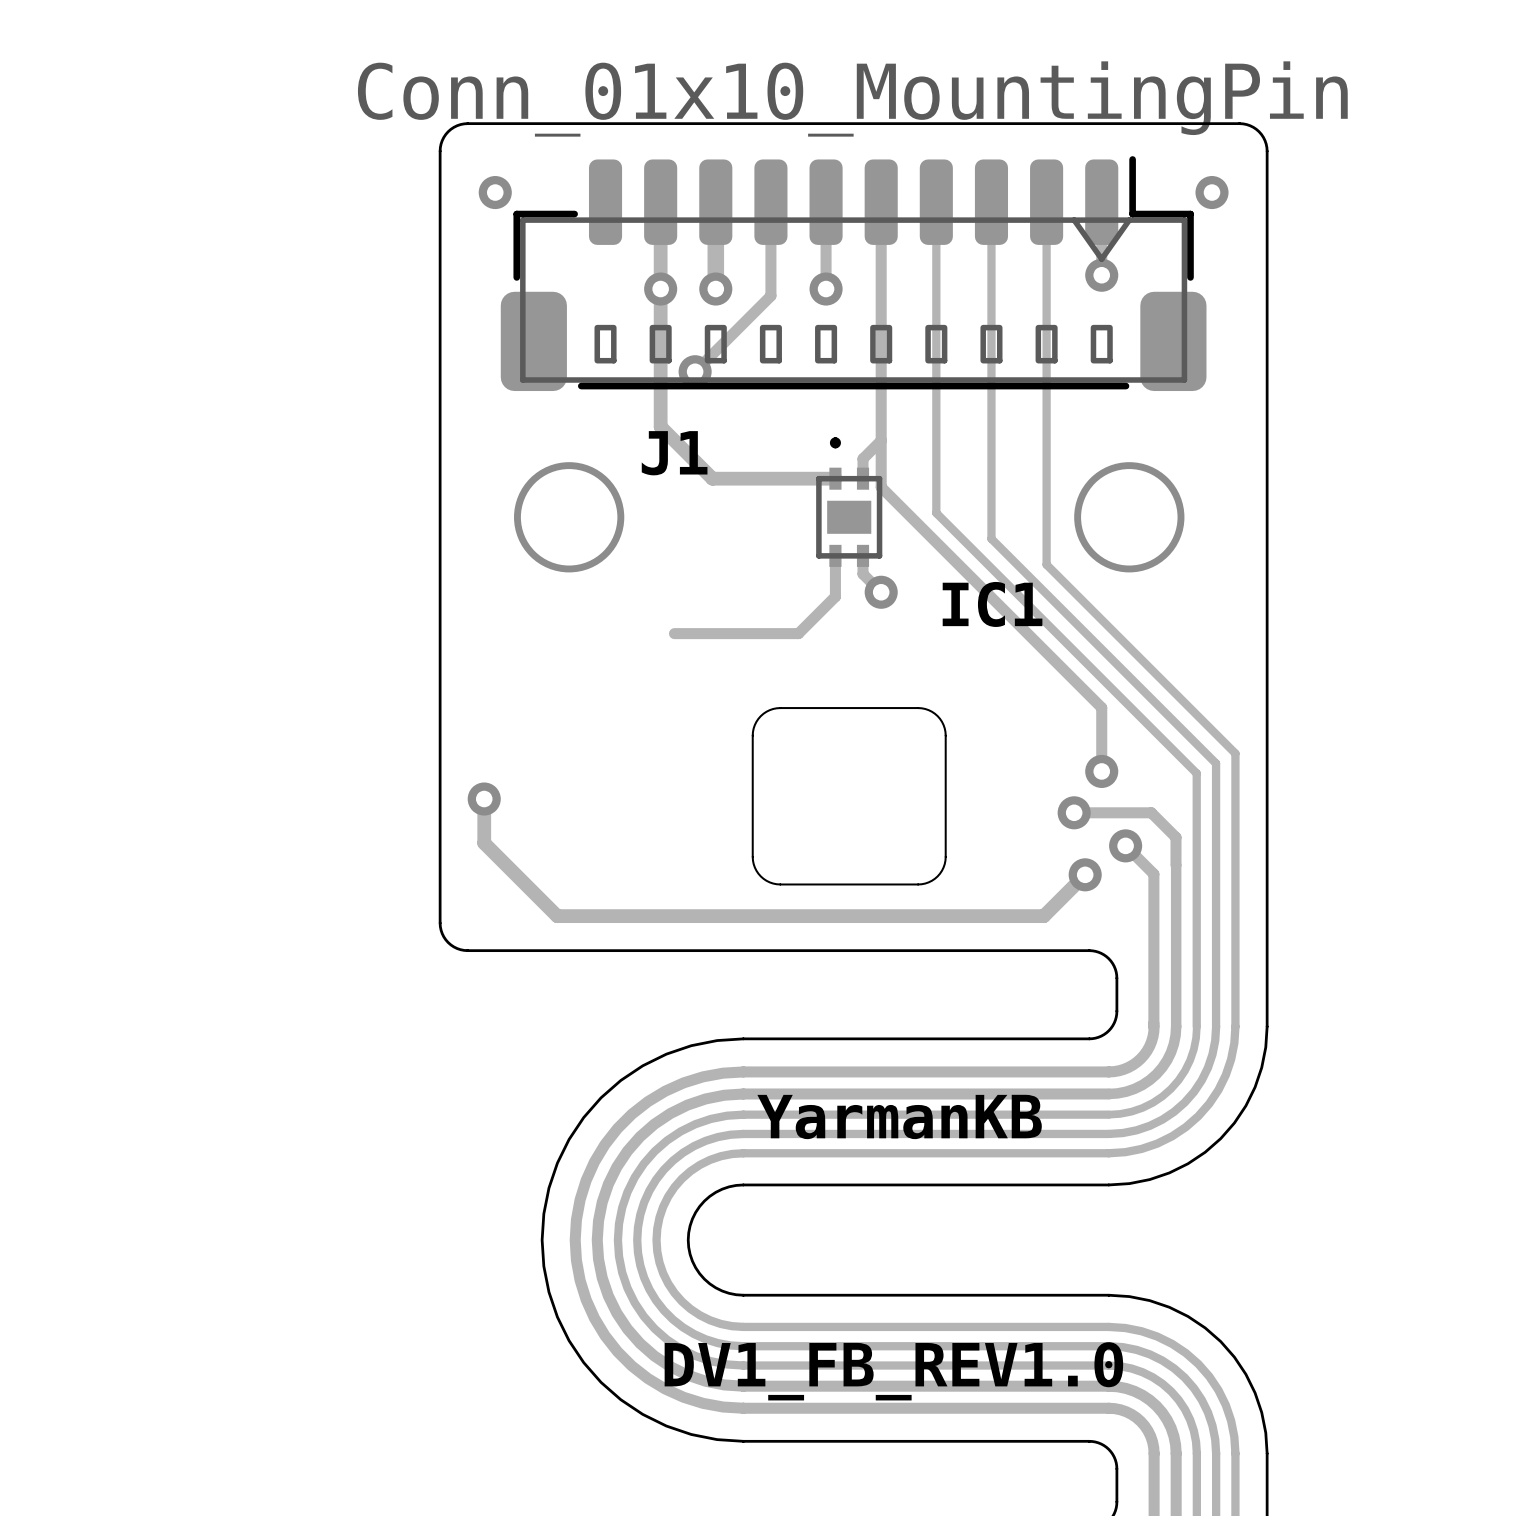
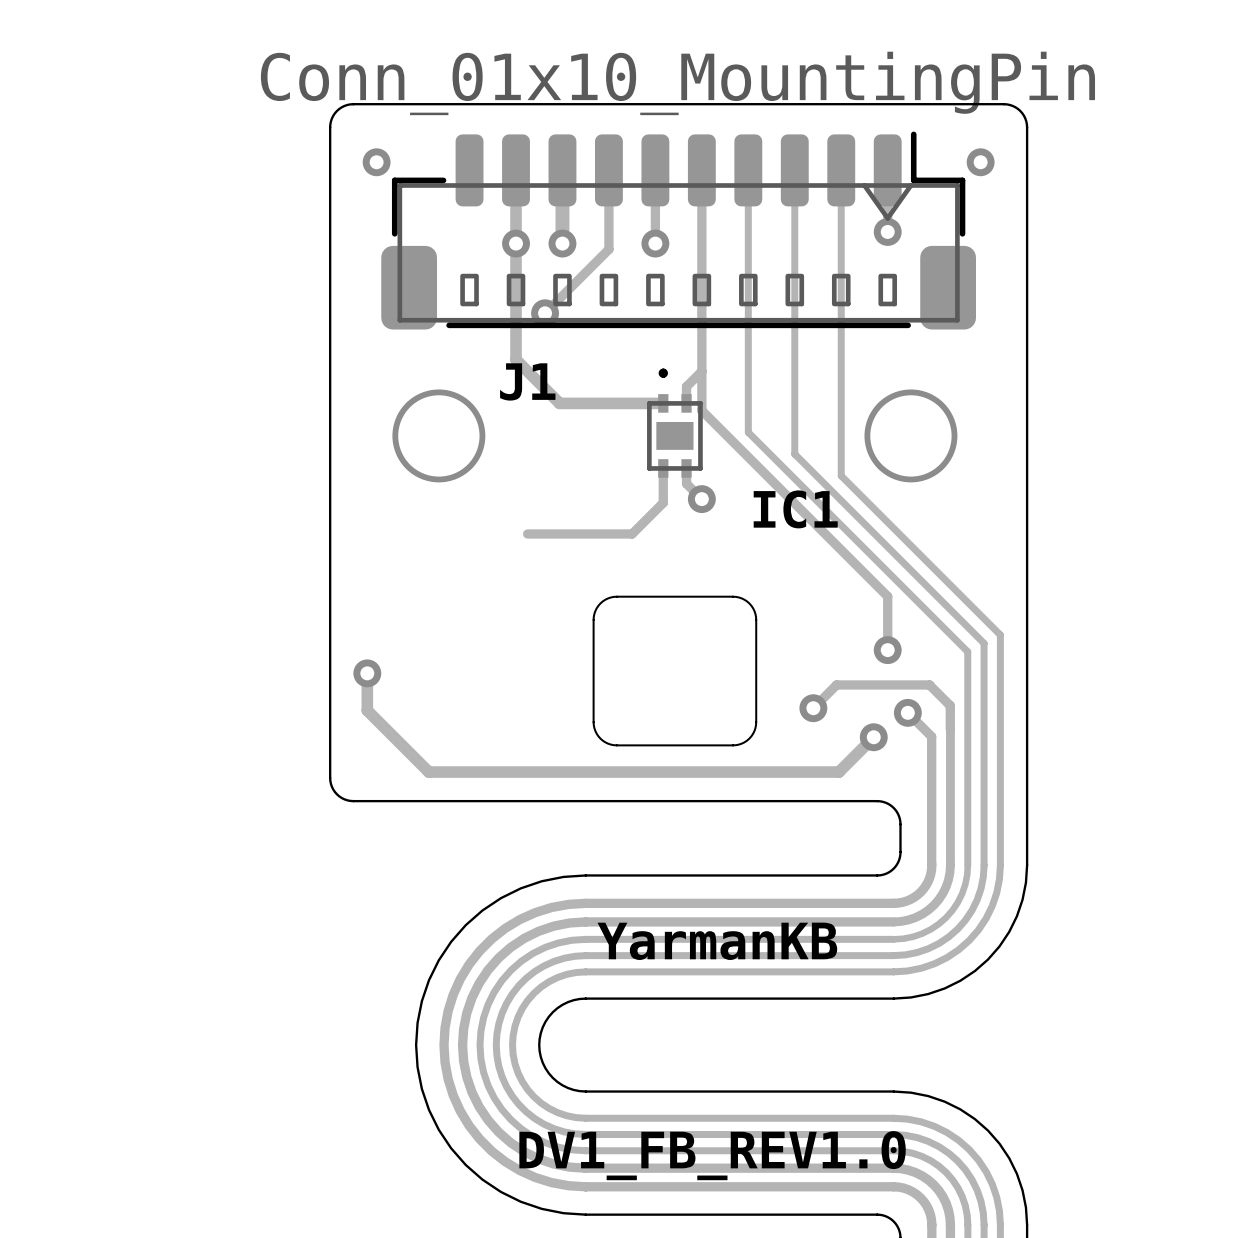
track: none -> (864, 684) (836, 684) (813, 708)
via position: (1074, 812) -> (813, 708)

